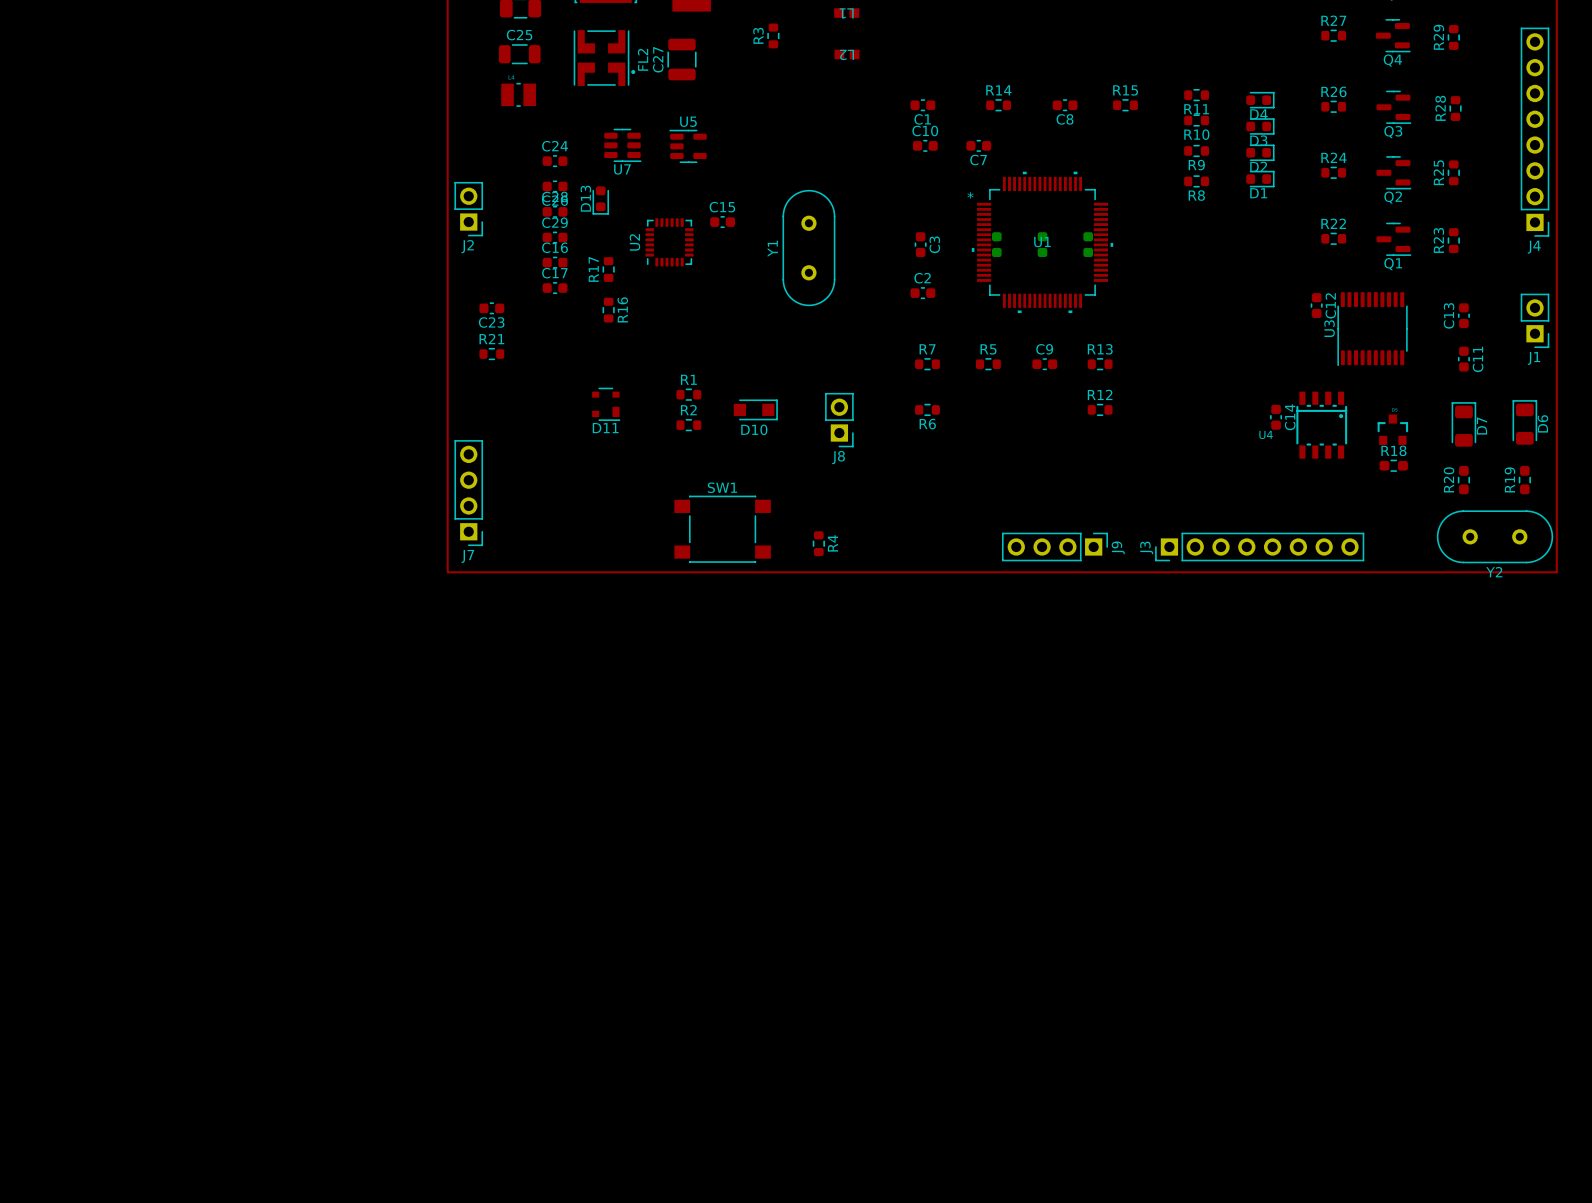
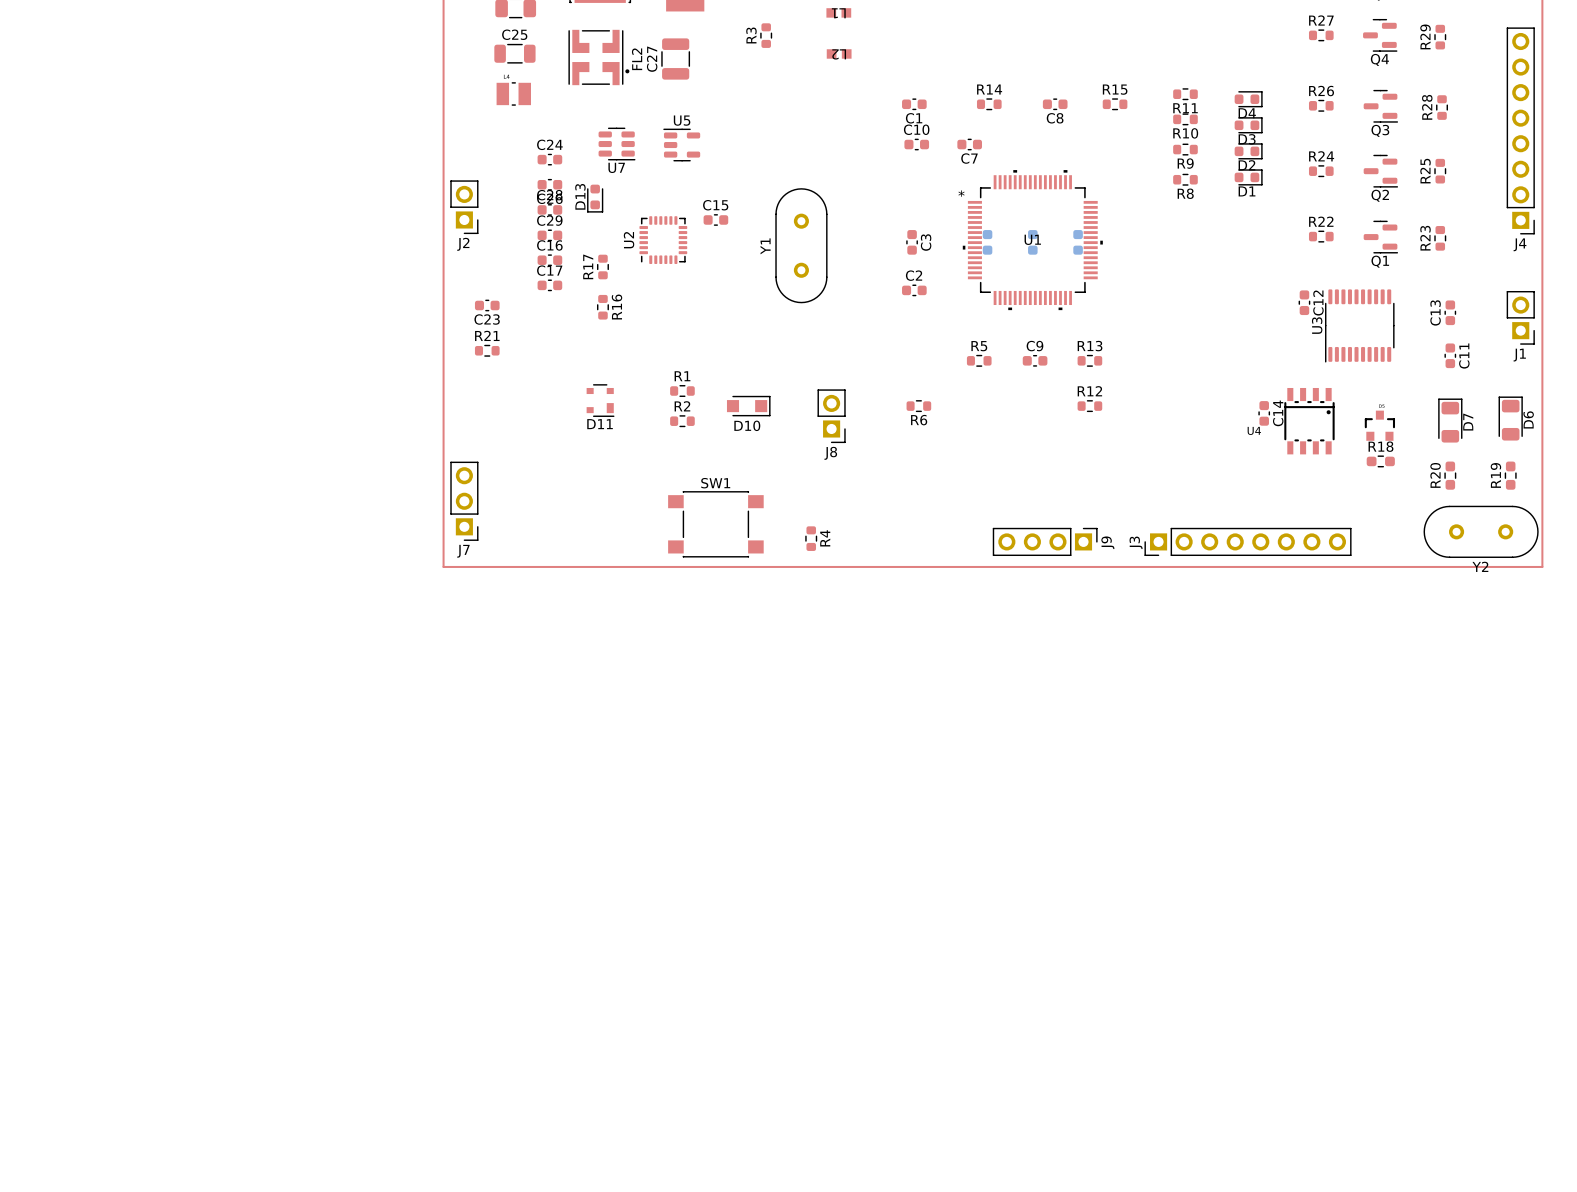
R7: (927, 364) -> none
J7 footprint: [454, 440, 483, 546] -> [450, 461, 479, 541]

